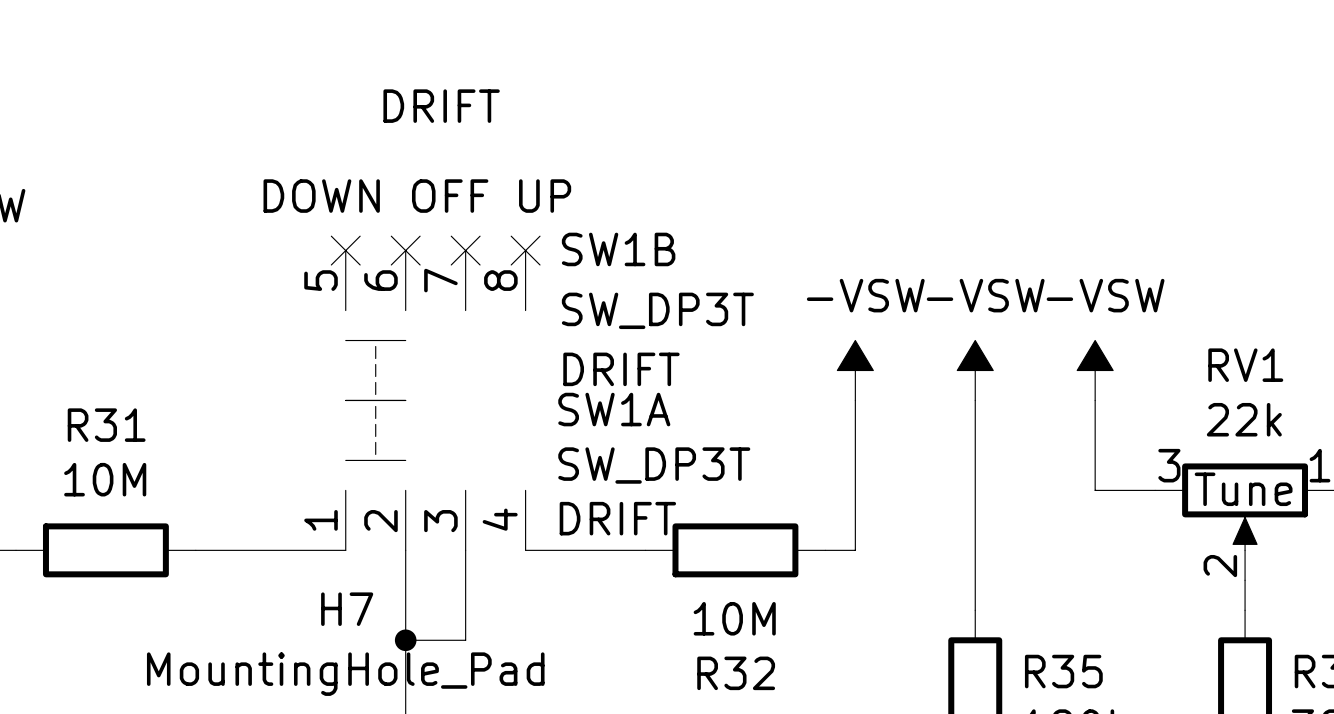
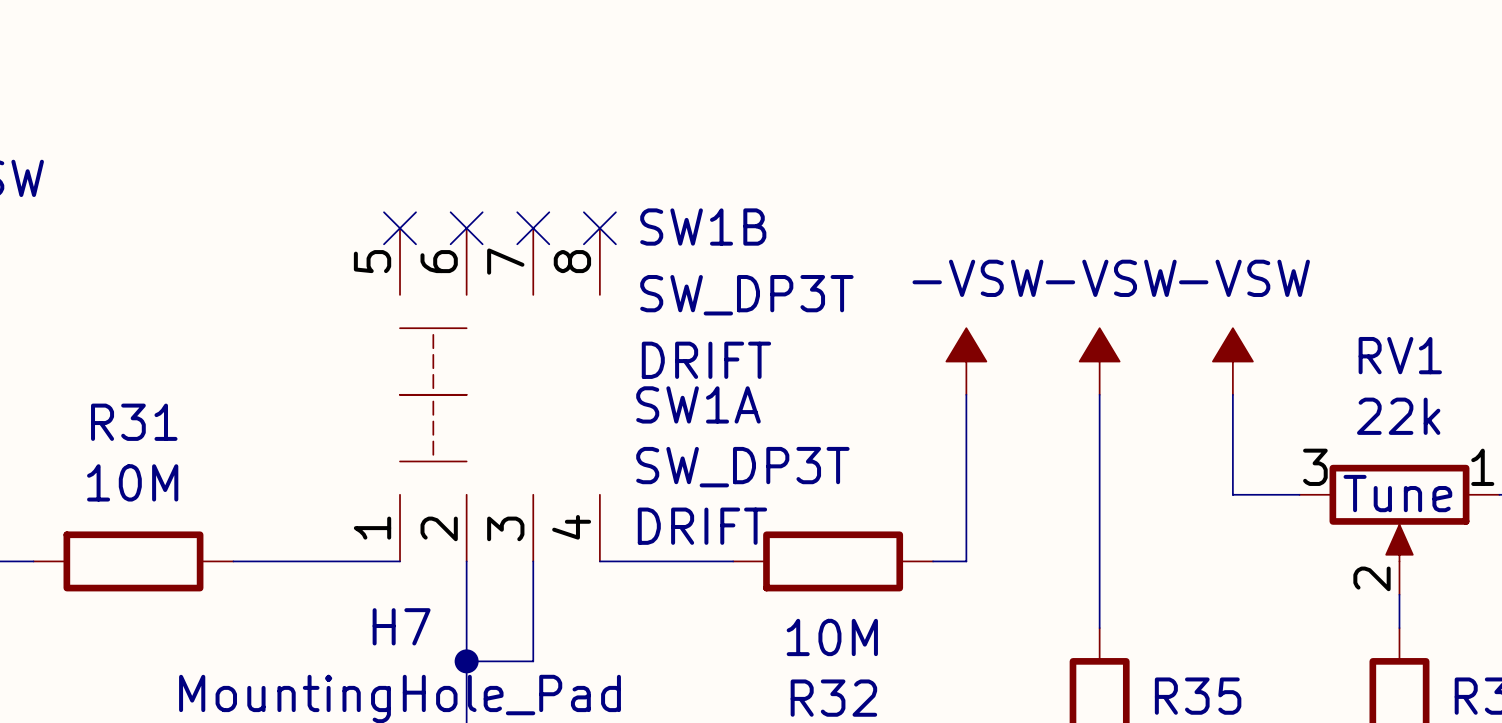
text: DRIFT (441, 106) -> none
text: DOWN OFF UP (417, 196) -> none

